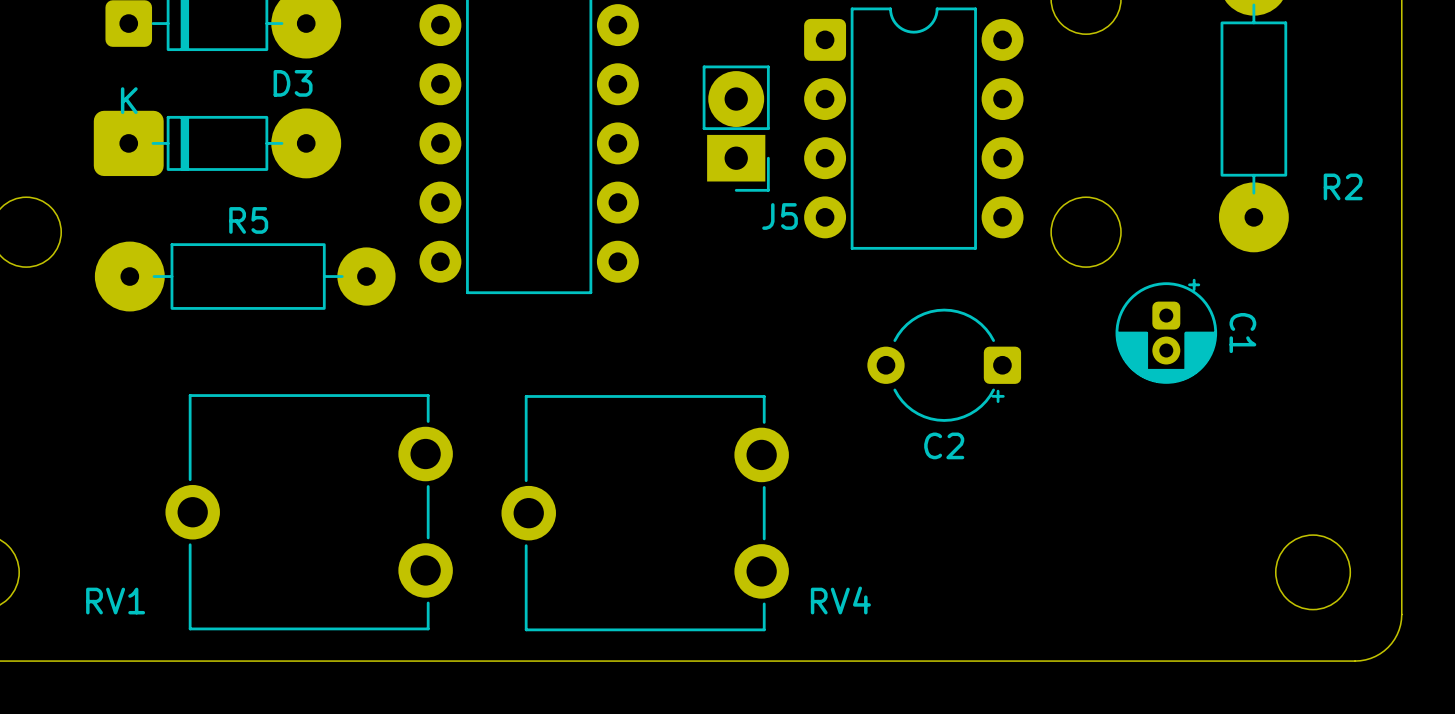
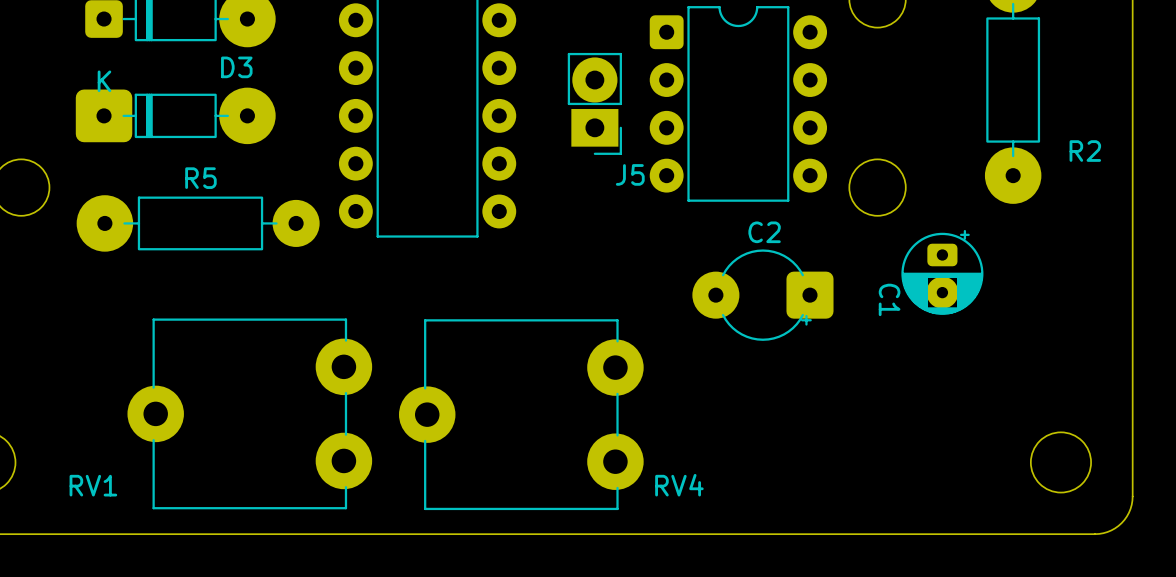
C1 footprint: [1115, 278, 1218, 384] -> [901, 229, 984, 315]
C2 footprint: [867, 308, 1022, 422] -> [692, 249, 834, 341]
C1 name position: C1 (1242, 333) -> C1 (889, 299)
RV1 footprint: [165, 394, 453, 631] -> [127, 318, 373, 510]
RV4 footprint: [501, 395, 789, 632] -> [399, 319, 644, 511]
C2 name position: C2 (944, 445) -> C2 (764, 232)

